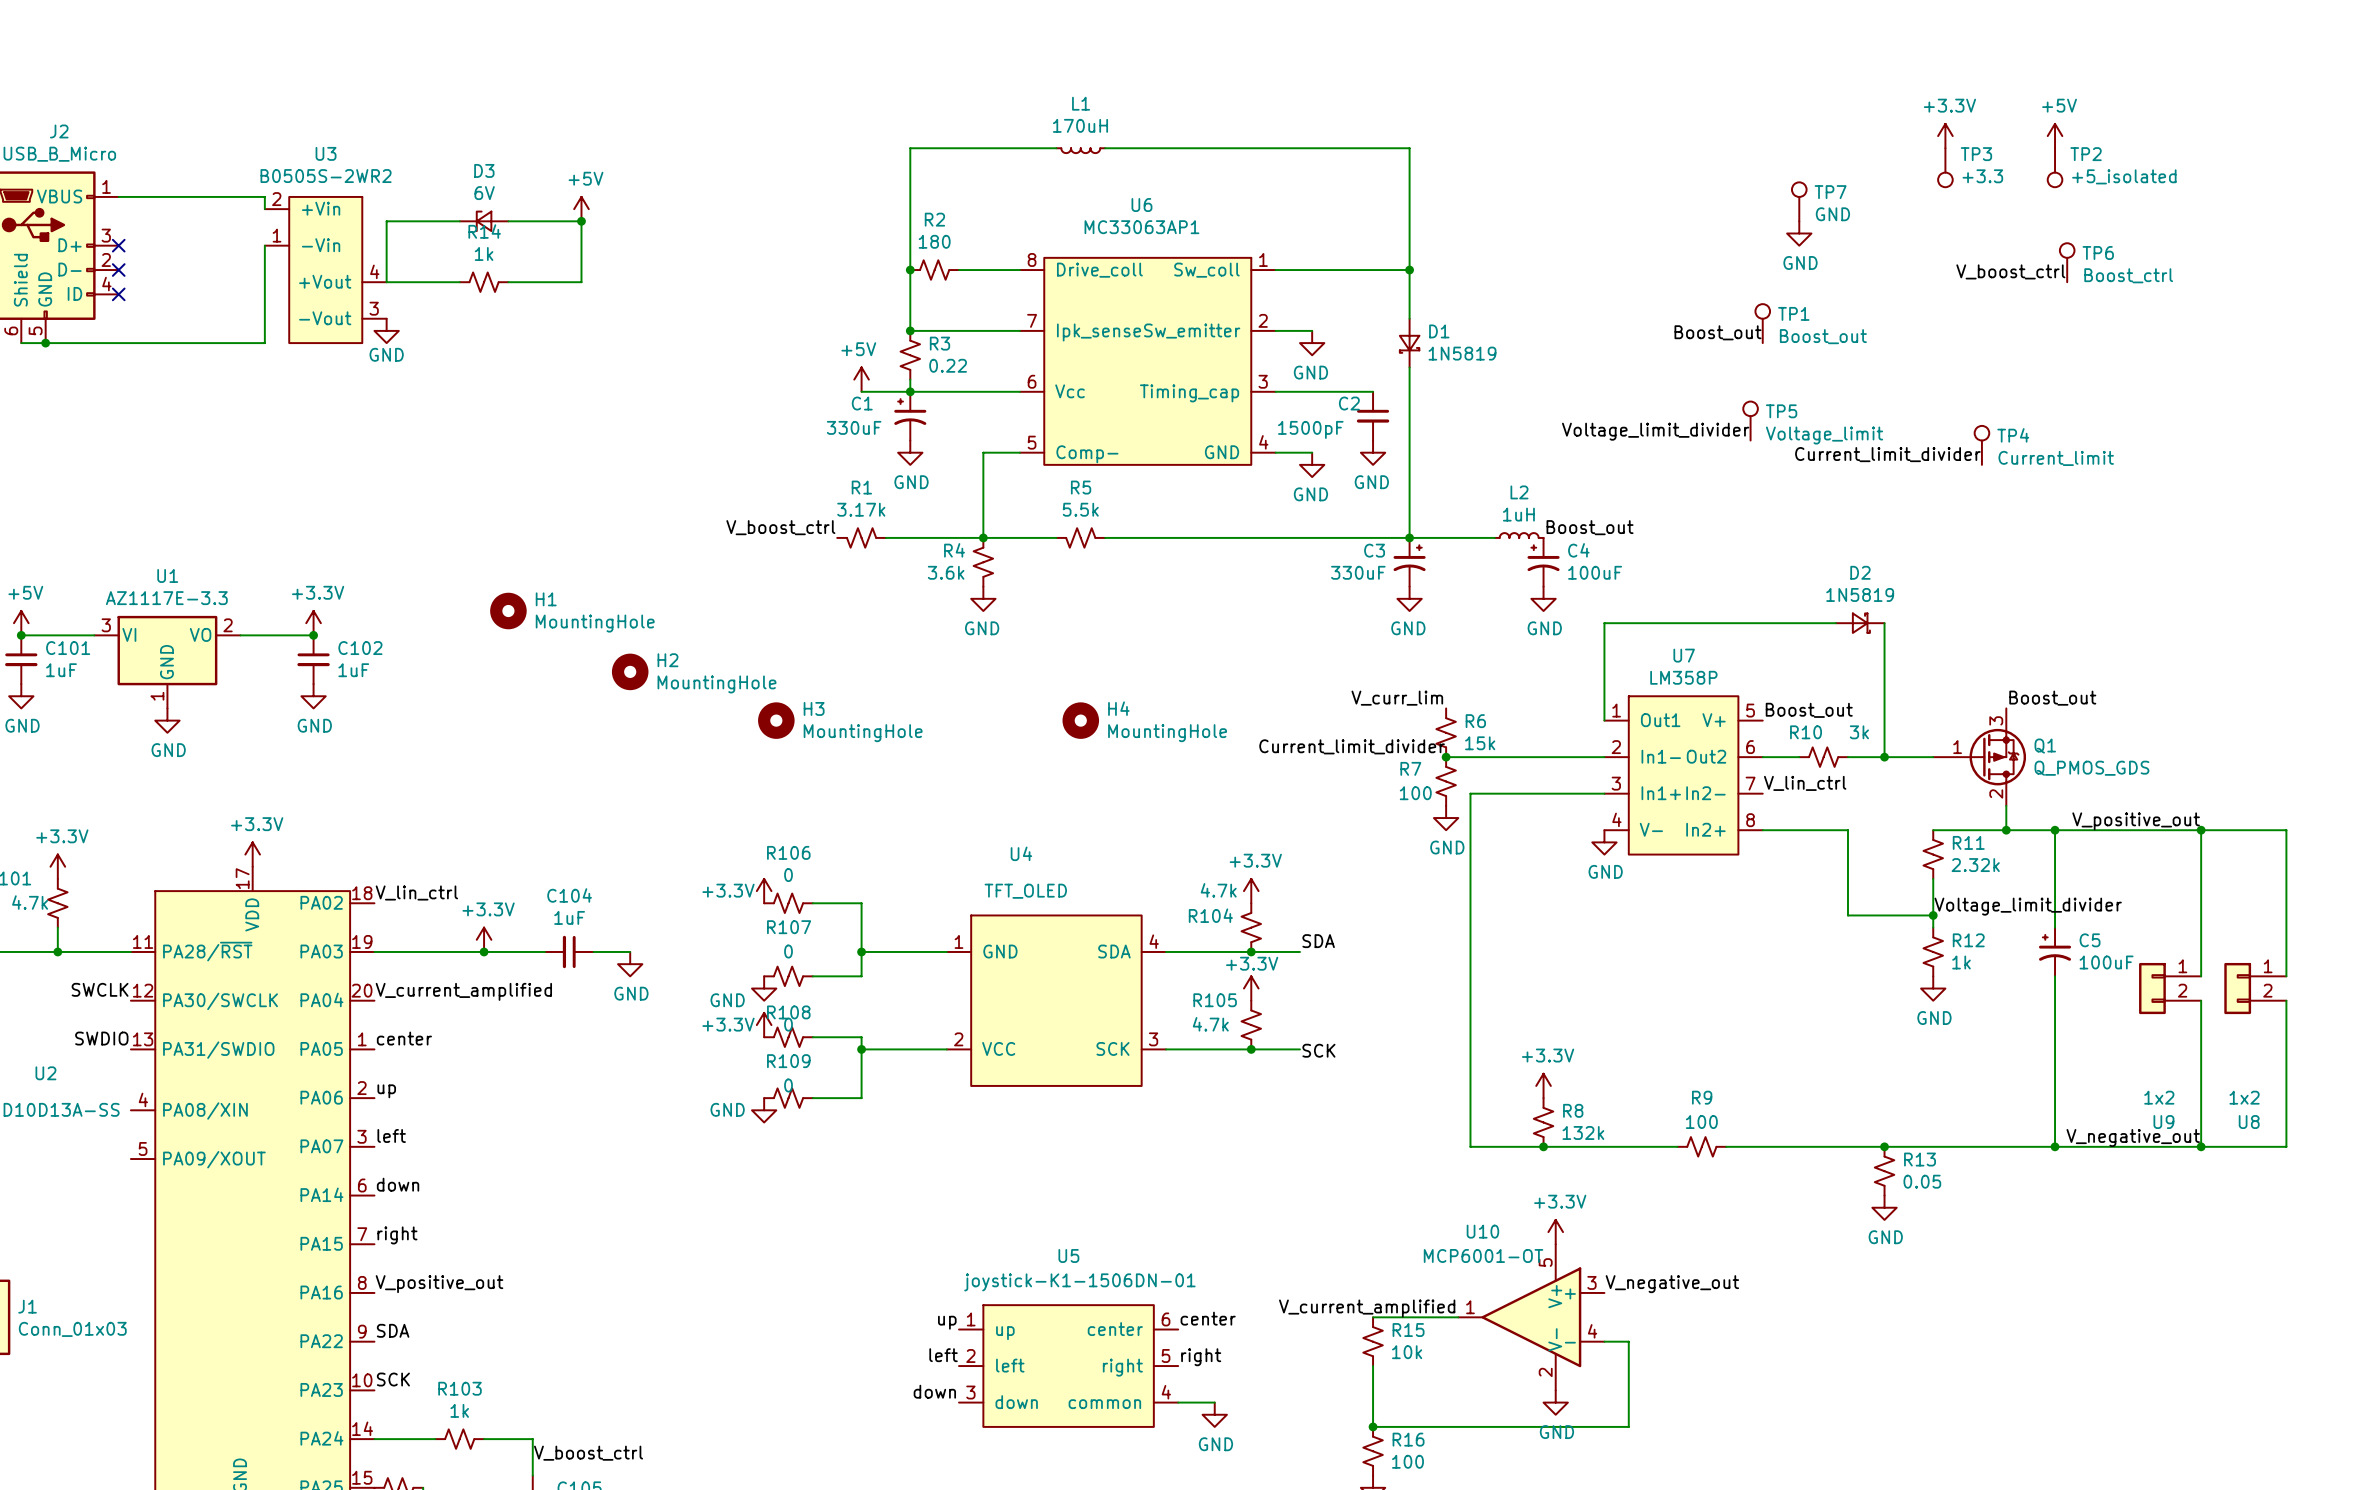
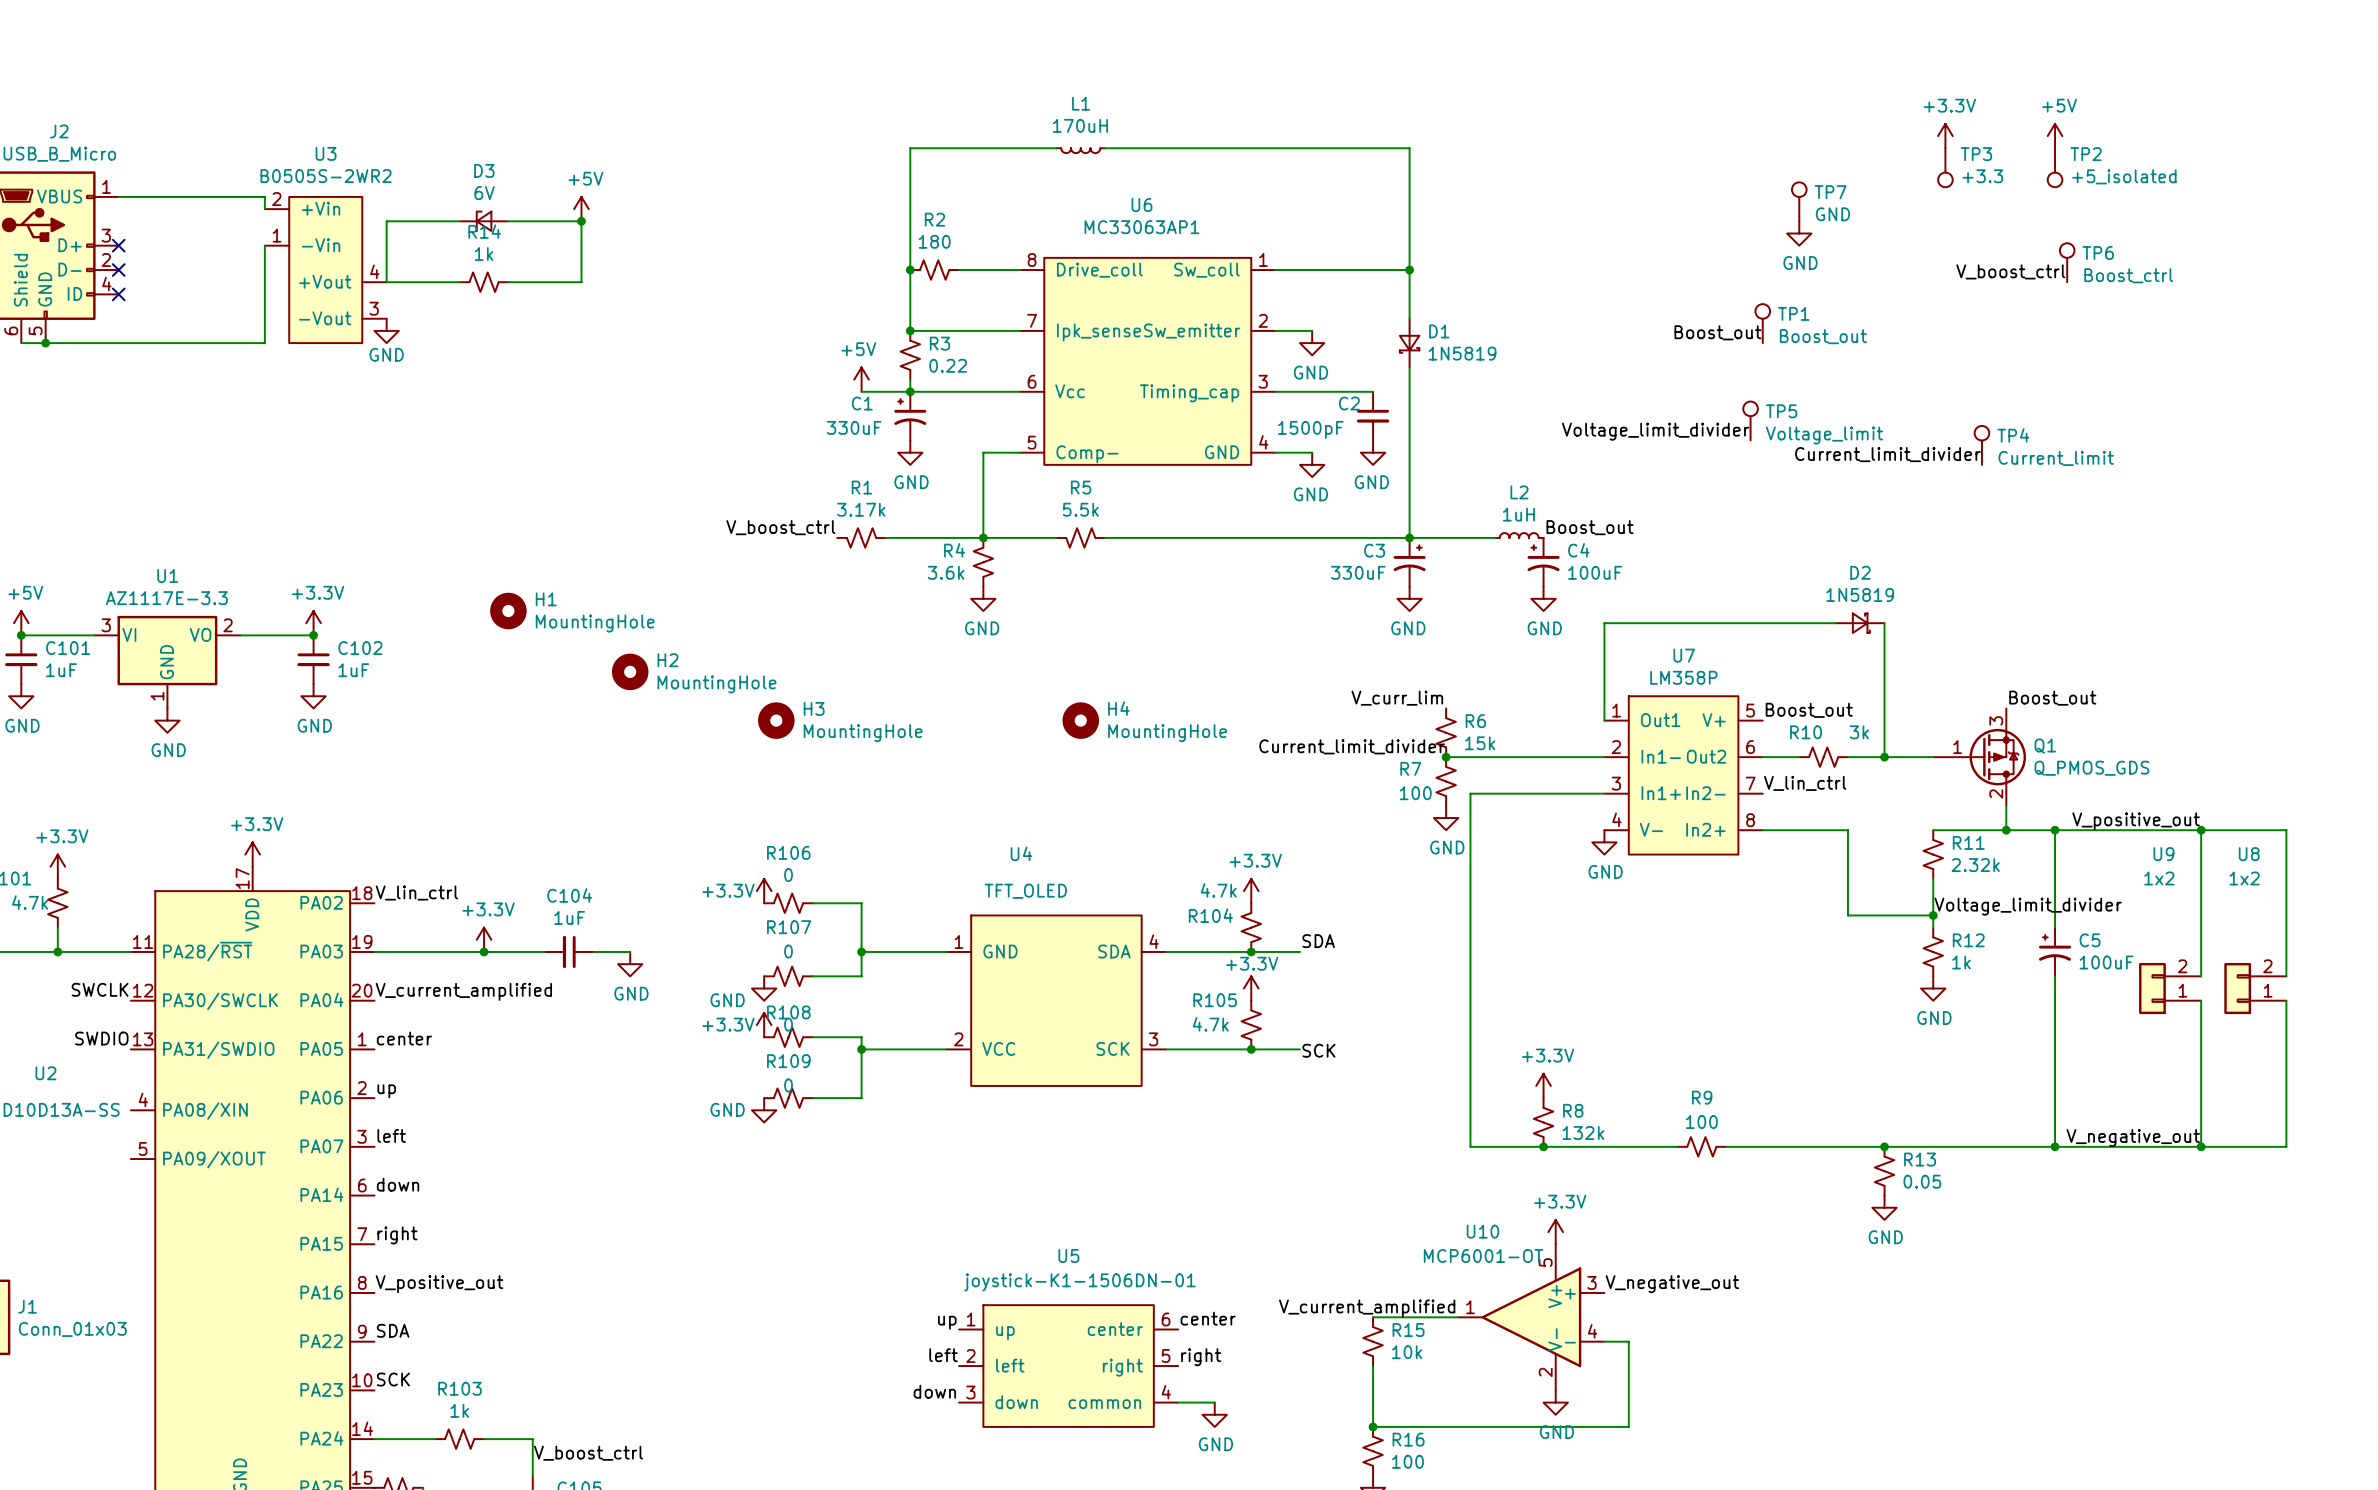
U9 flip: as is (2152, 988) -> up-down (2152, 988)
U8 flip: as is (2237, 988) -> up-down (2237, 988)

